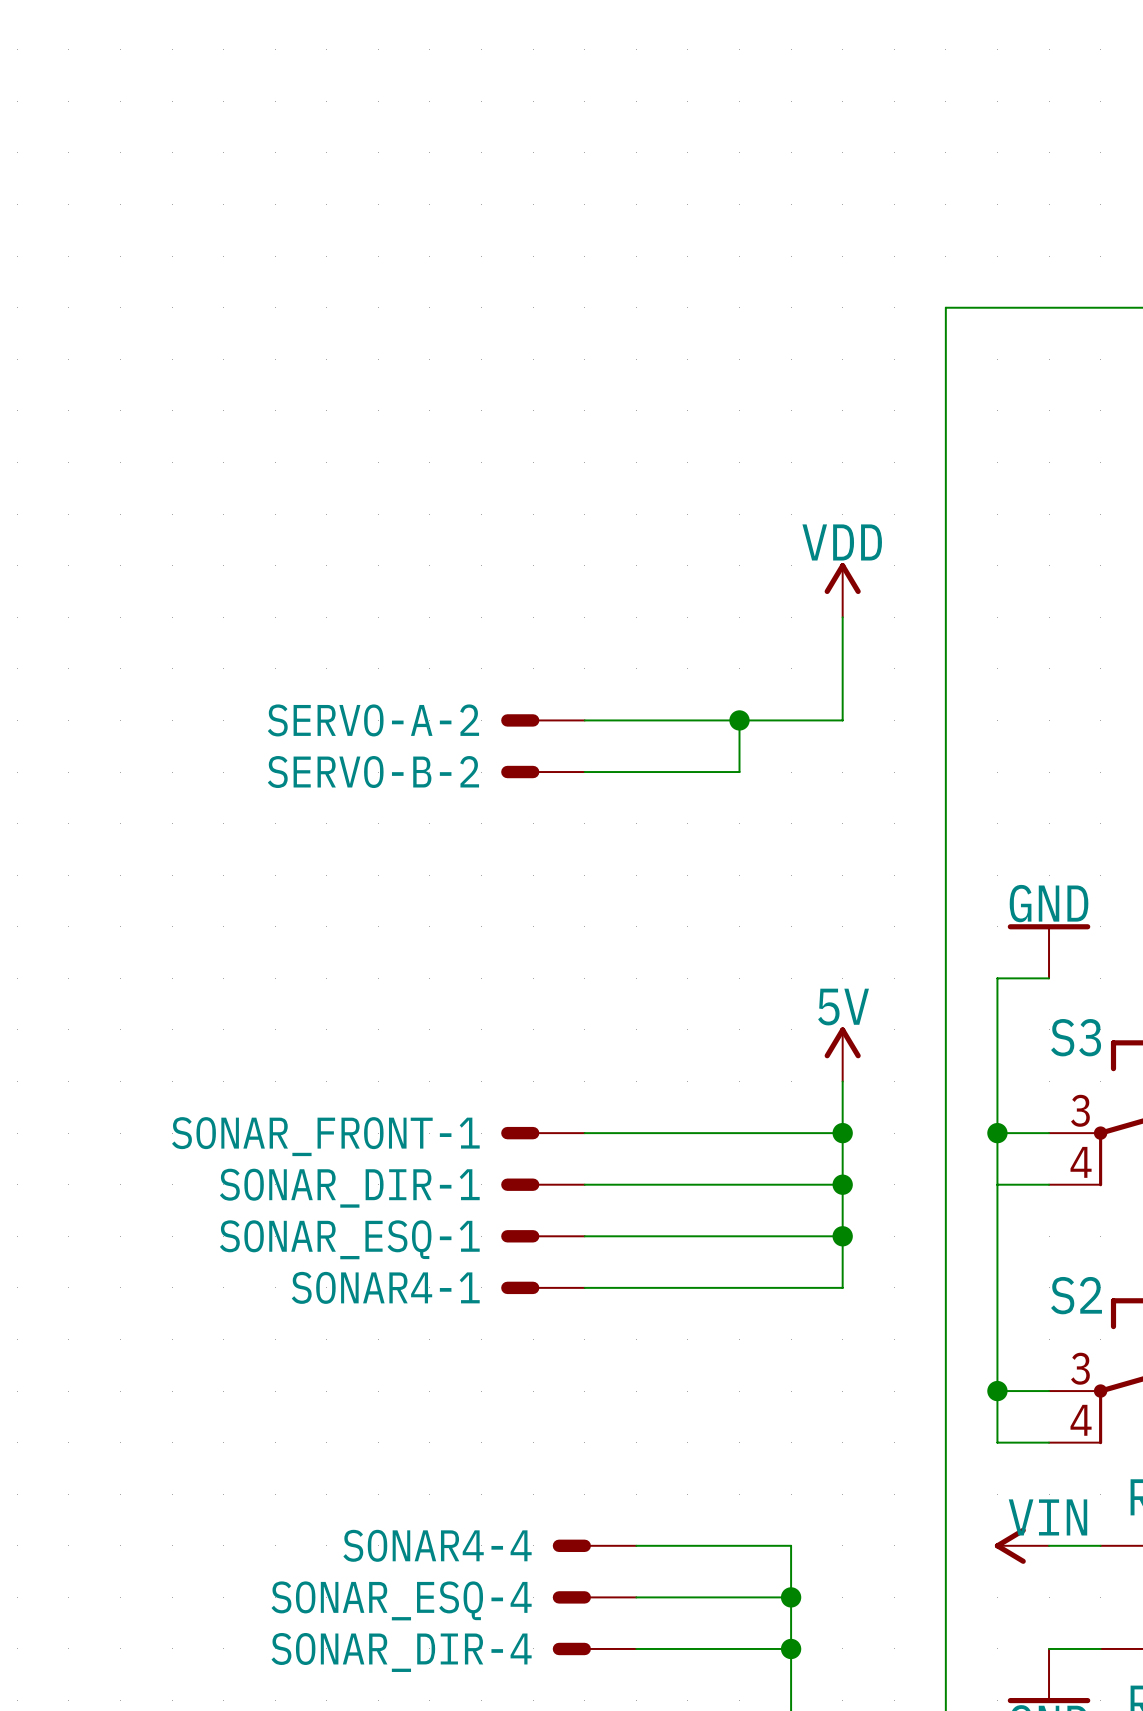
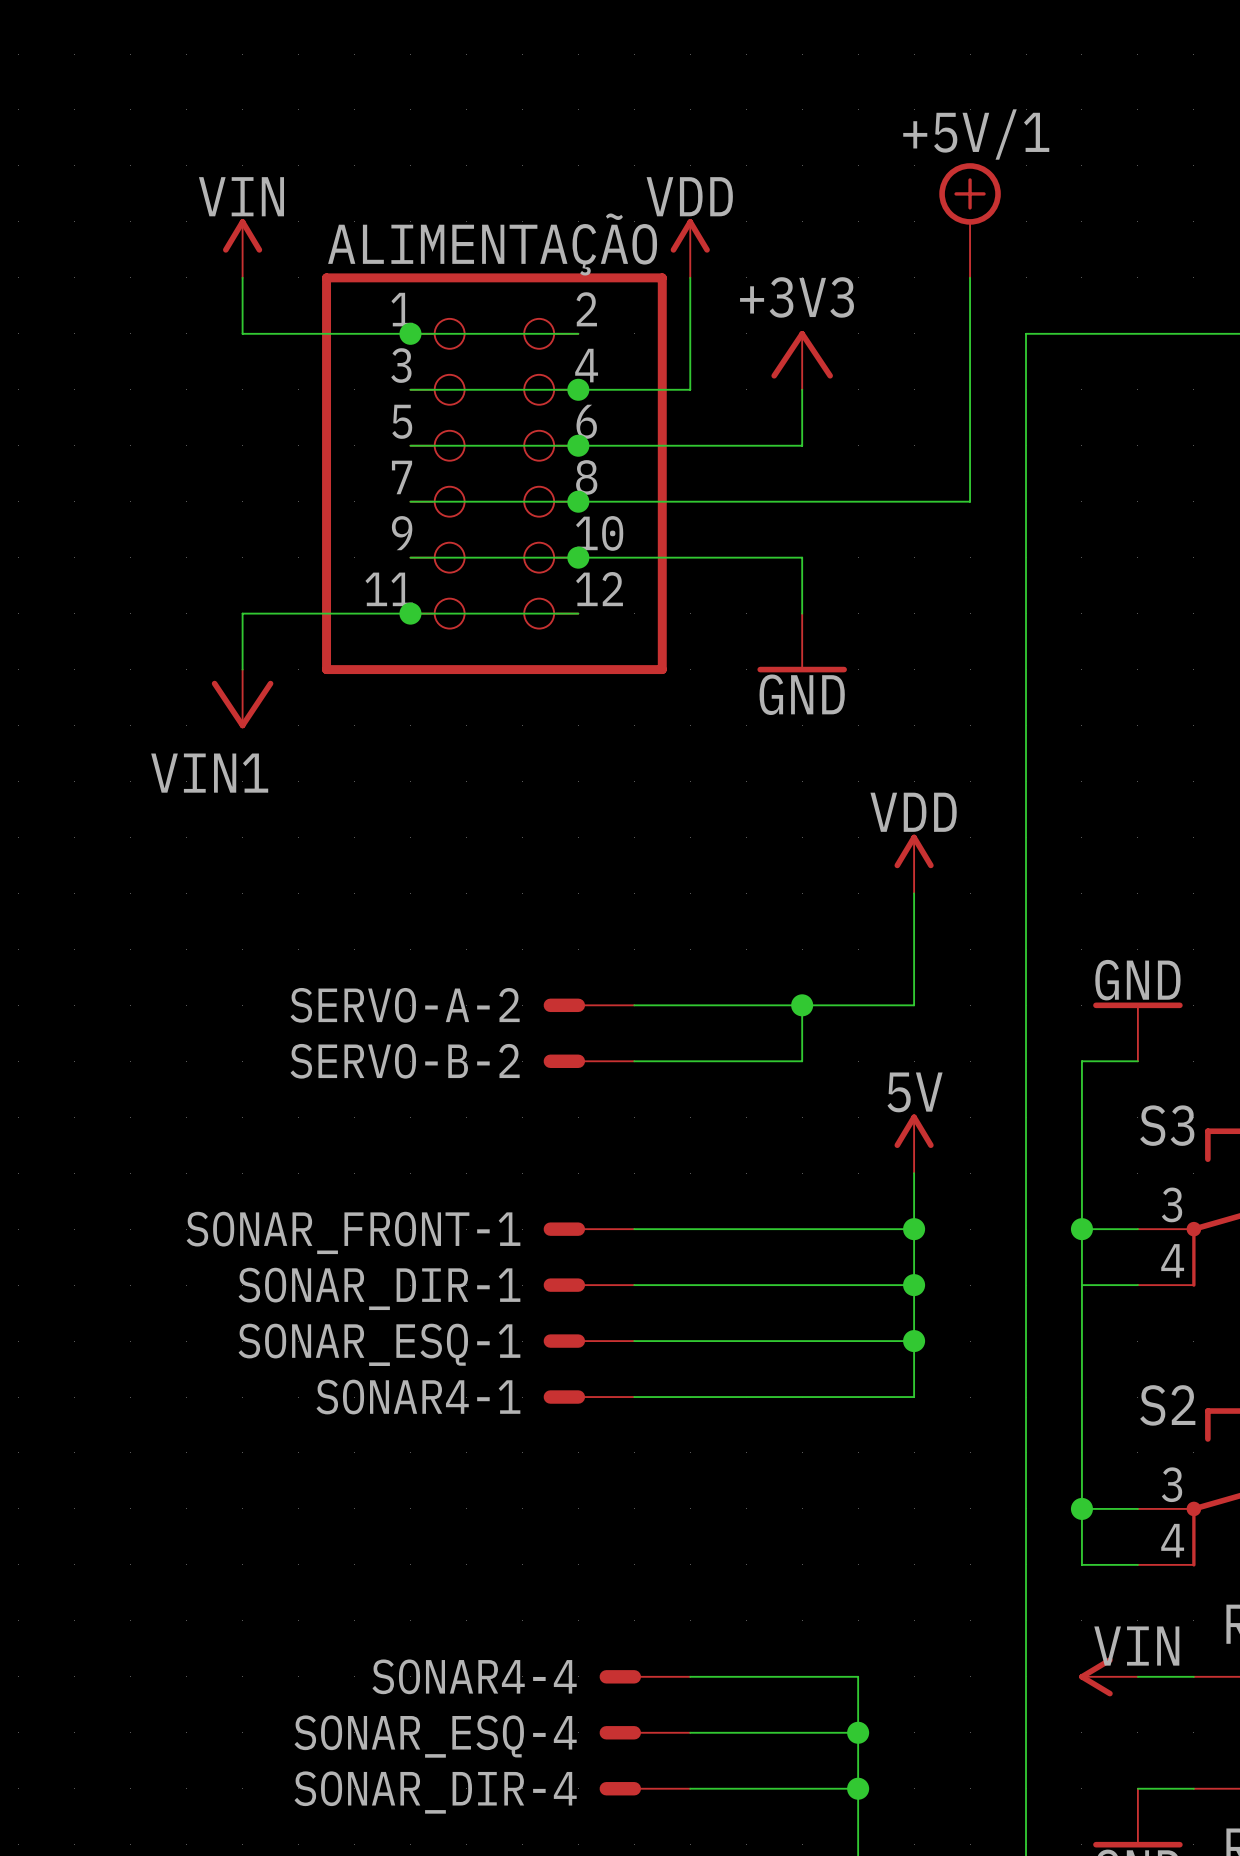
power symbol: none -> +5V/1 (970, 220)
power symbol: none -> VIN (242, 248)
power symbol: none -> VDD (690, 248)
wire: none -> (242, 277) (242, 333) (578, 333)
wire: none -> (690, 277) (690, 389) (410, 389)
wire: none -> (970, 277) (970, 501) (410, 501)
junction: none -> (410, 333)
power symbol: none -> +3V3 (802, 360)
junction: none -> (578, 389)
wire: none -> (802, 389) (802, 445) (410, 445)
junction: none -> (578, 445)
ALIMENTAÇÃO: none -> (494, 473)
junction: none -> (578, 501)
wire: none -> (410, 557) (802, 557) (802, 613)
junction: none -> (578, 557)
junction: none -> (410, 613)
wire: none -> (578, 613) (242, 613) (242, 669)
power symbol position: VDD (842, 590) -> VDD (914, 864)
power symbol: none -> GND (802, 642)
wire: (842, 617) (842, 720) (584, 720) -> (914, 893) (914, 1005) (634, 1005)
power symbol: none -> VIN1 (242, 698)
SERVO-A-2 position: (542, 720) -> (588, 1005)
wire: (739, 720) (739, 772) (584, 772) -> (802, 1005) (802, 1061) (634, 1061)
junction: (739, 720) -> none
SERVO-B-2 position: (542, 772) -> (588, 1061)
junction: none -> (802, 1005)

